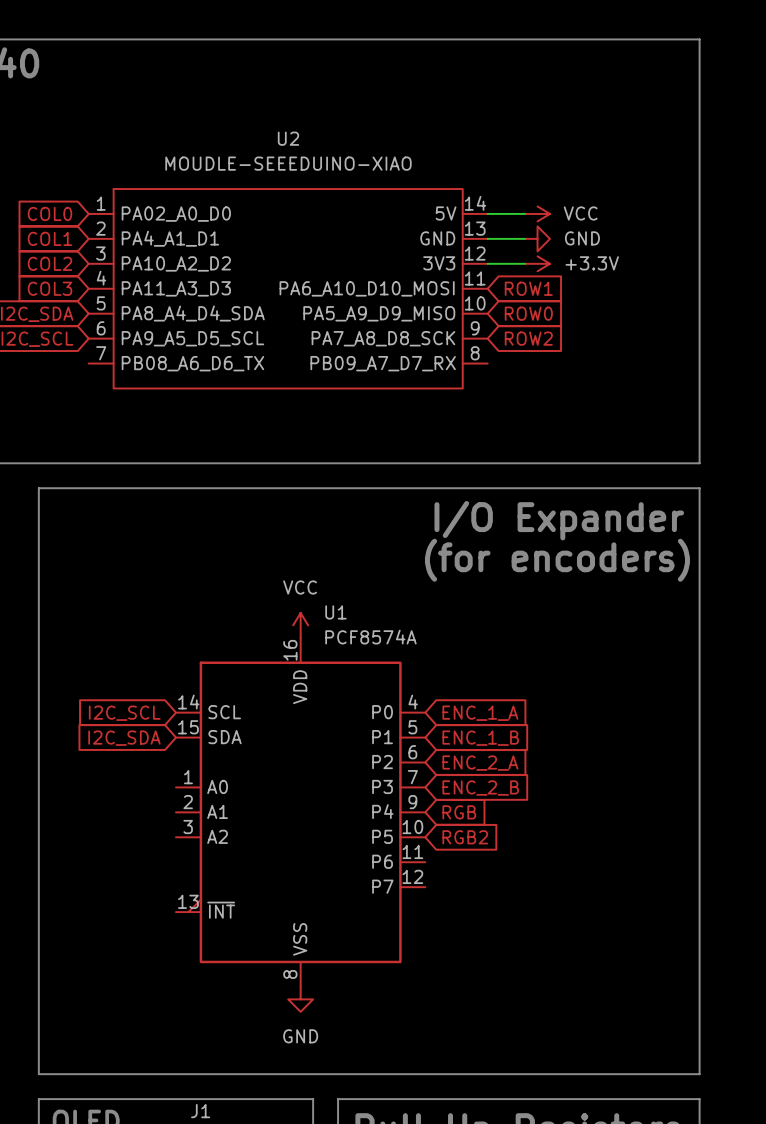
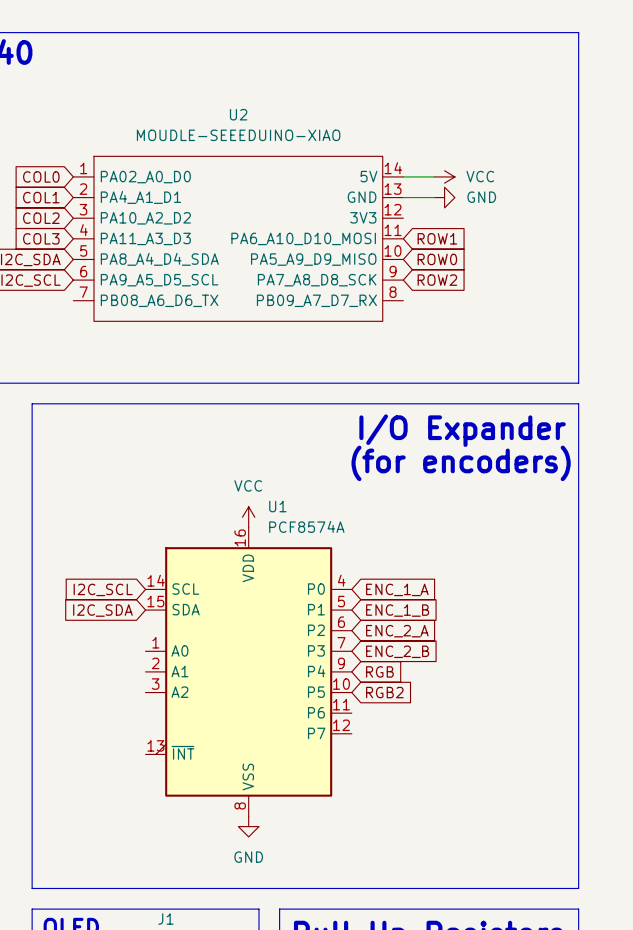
wire: (487, 263) (525, 263) -> none
power symbol: +3.3V (537, 263) -> none

